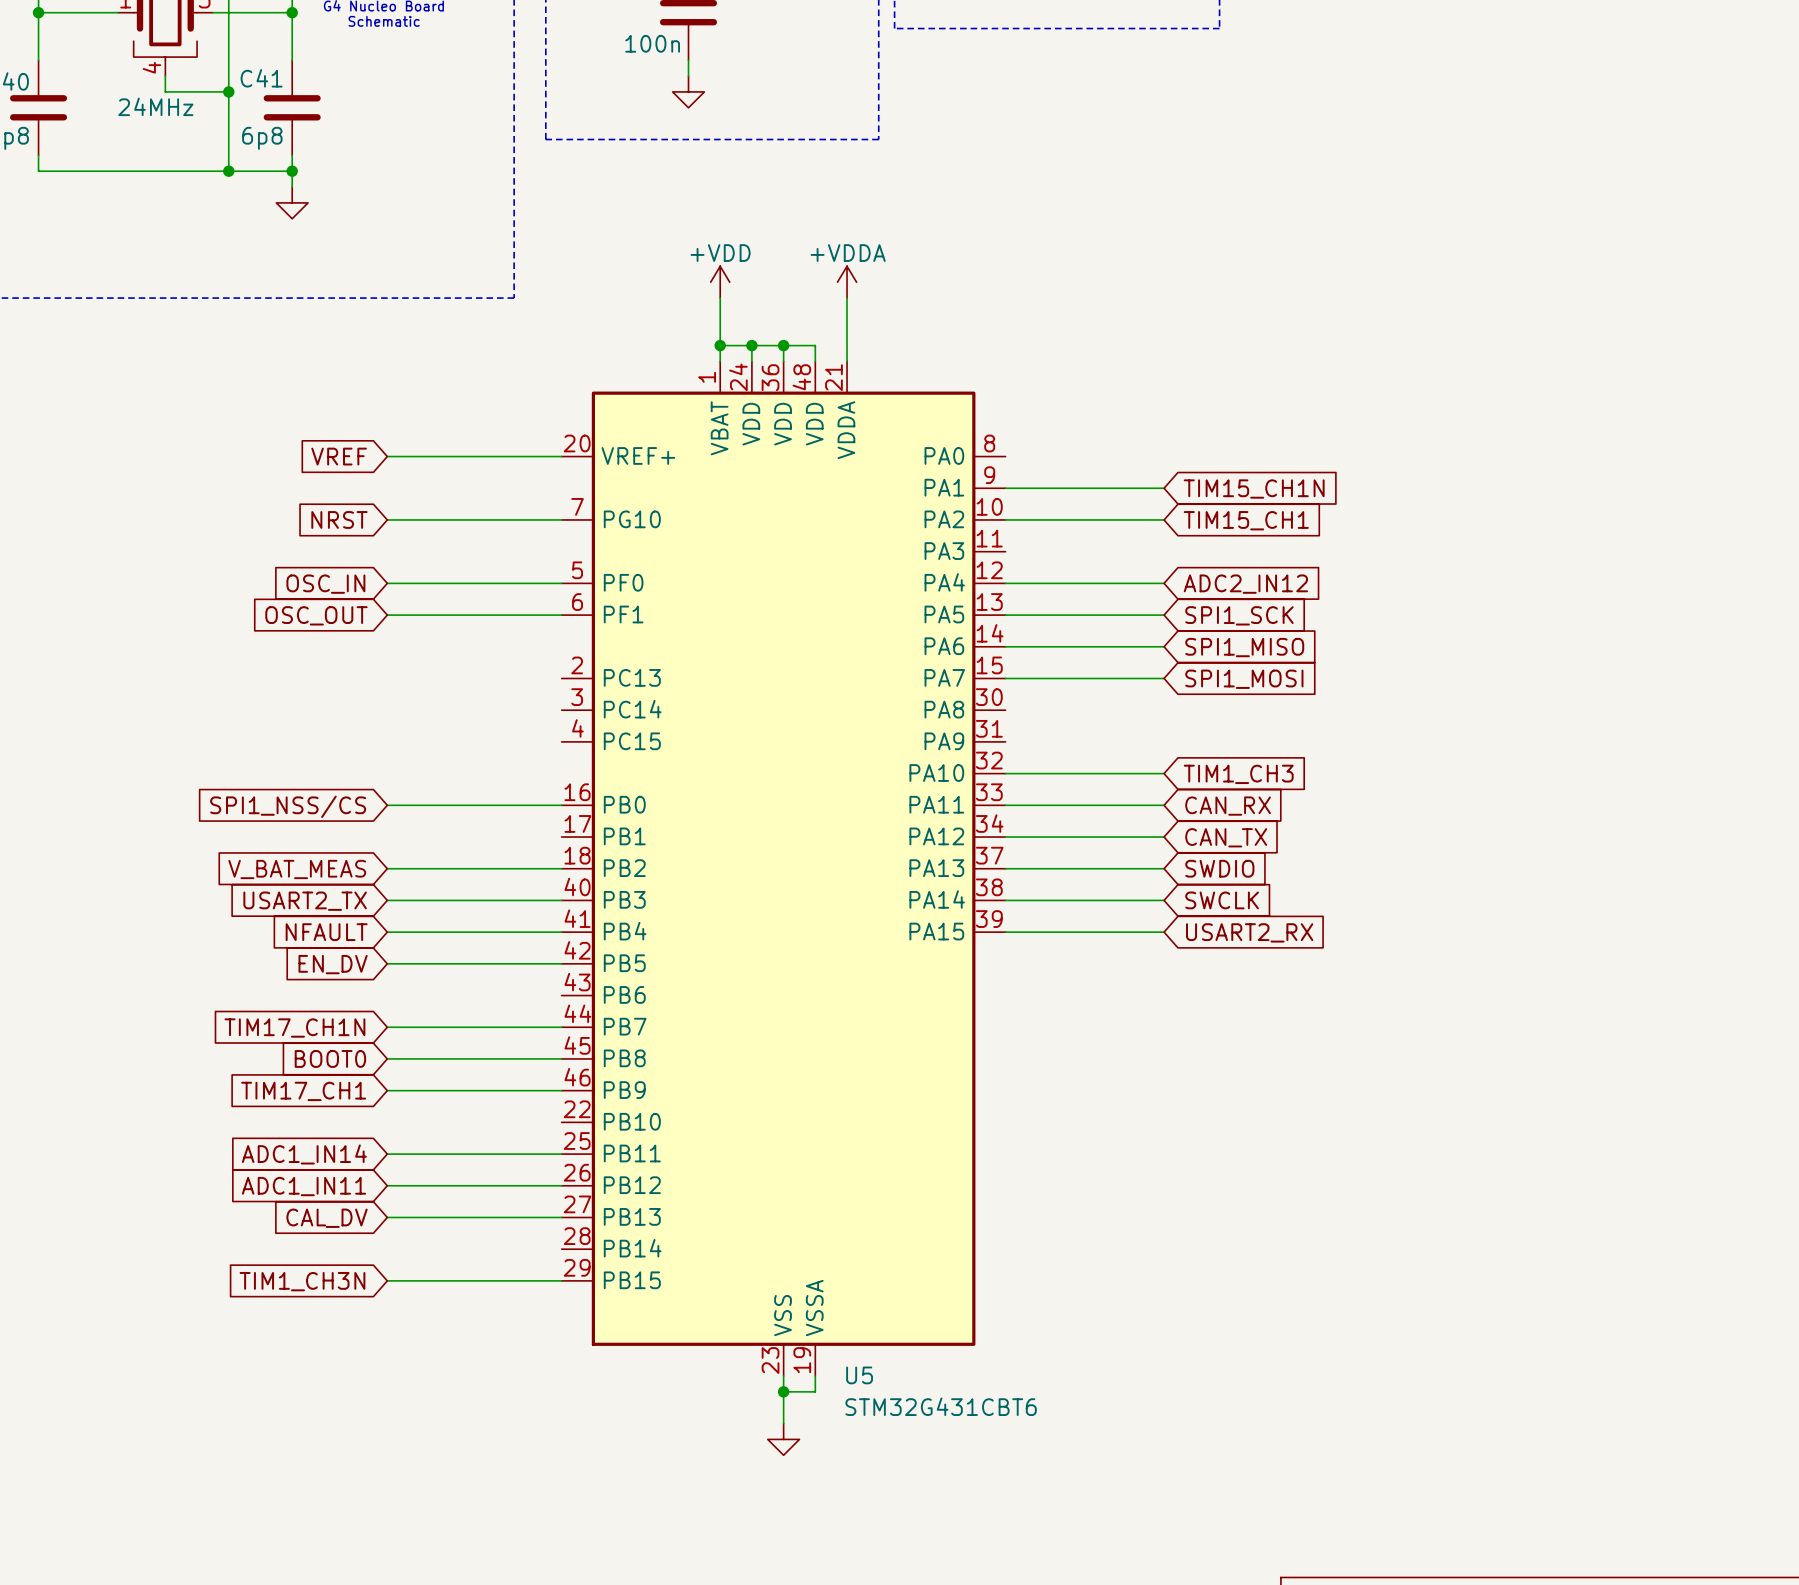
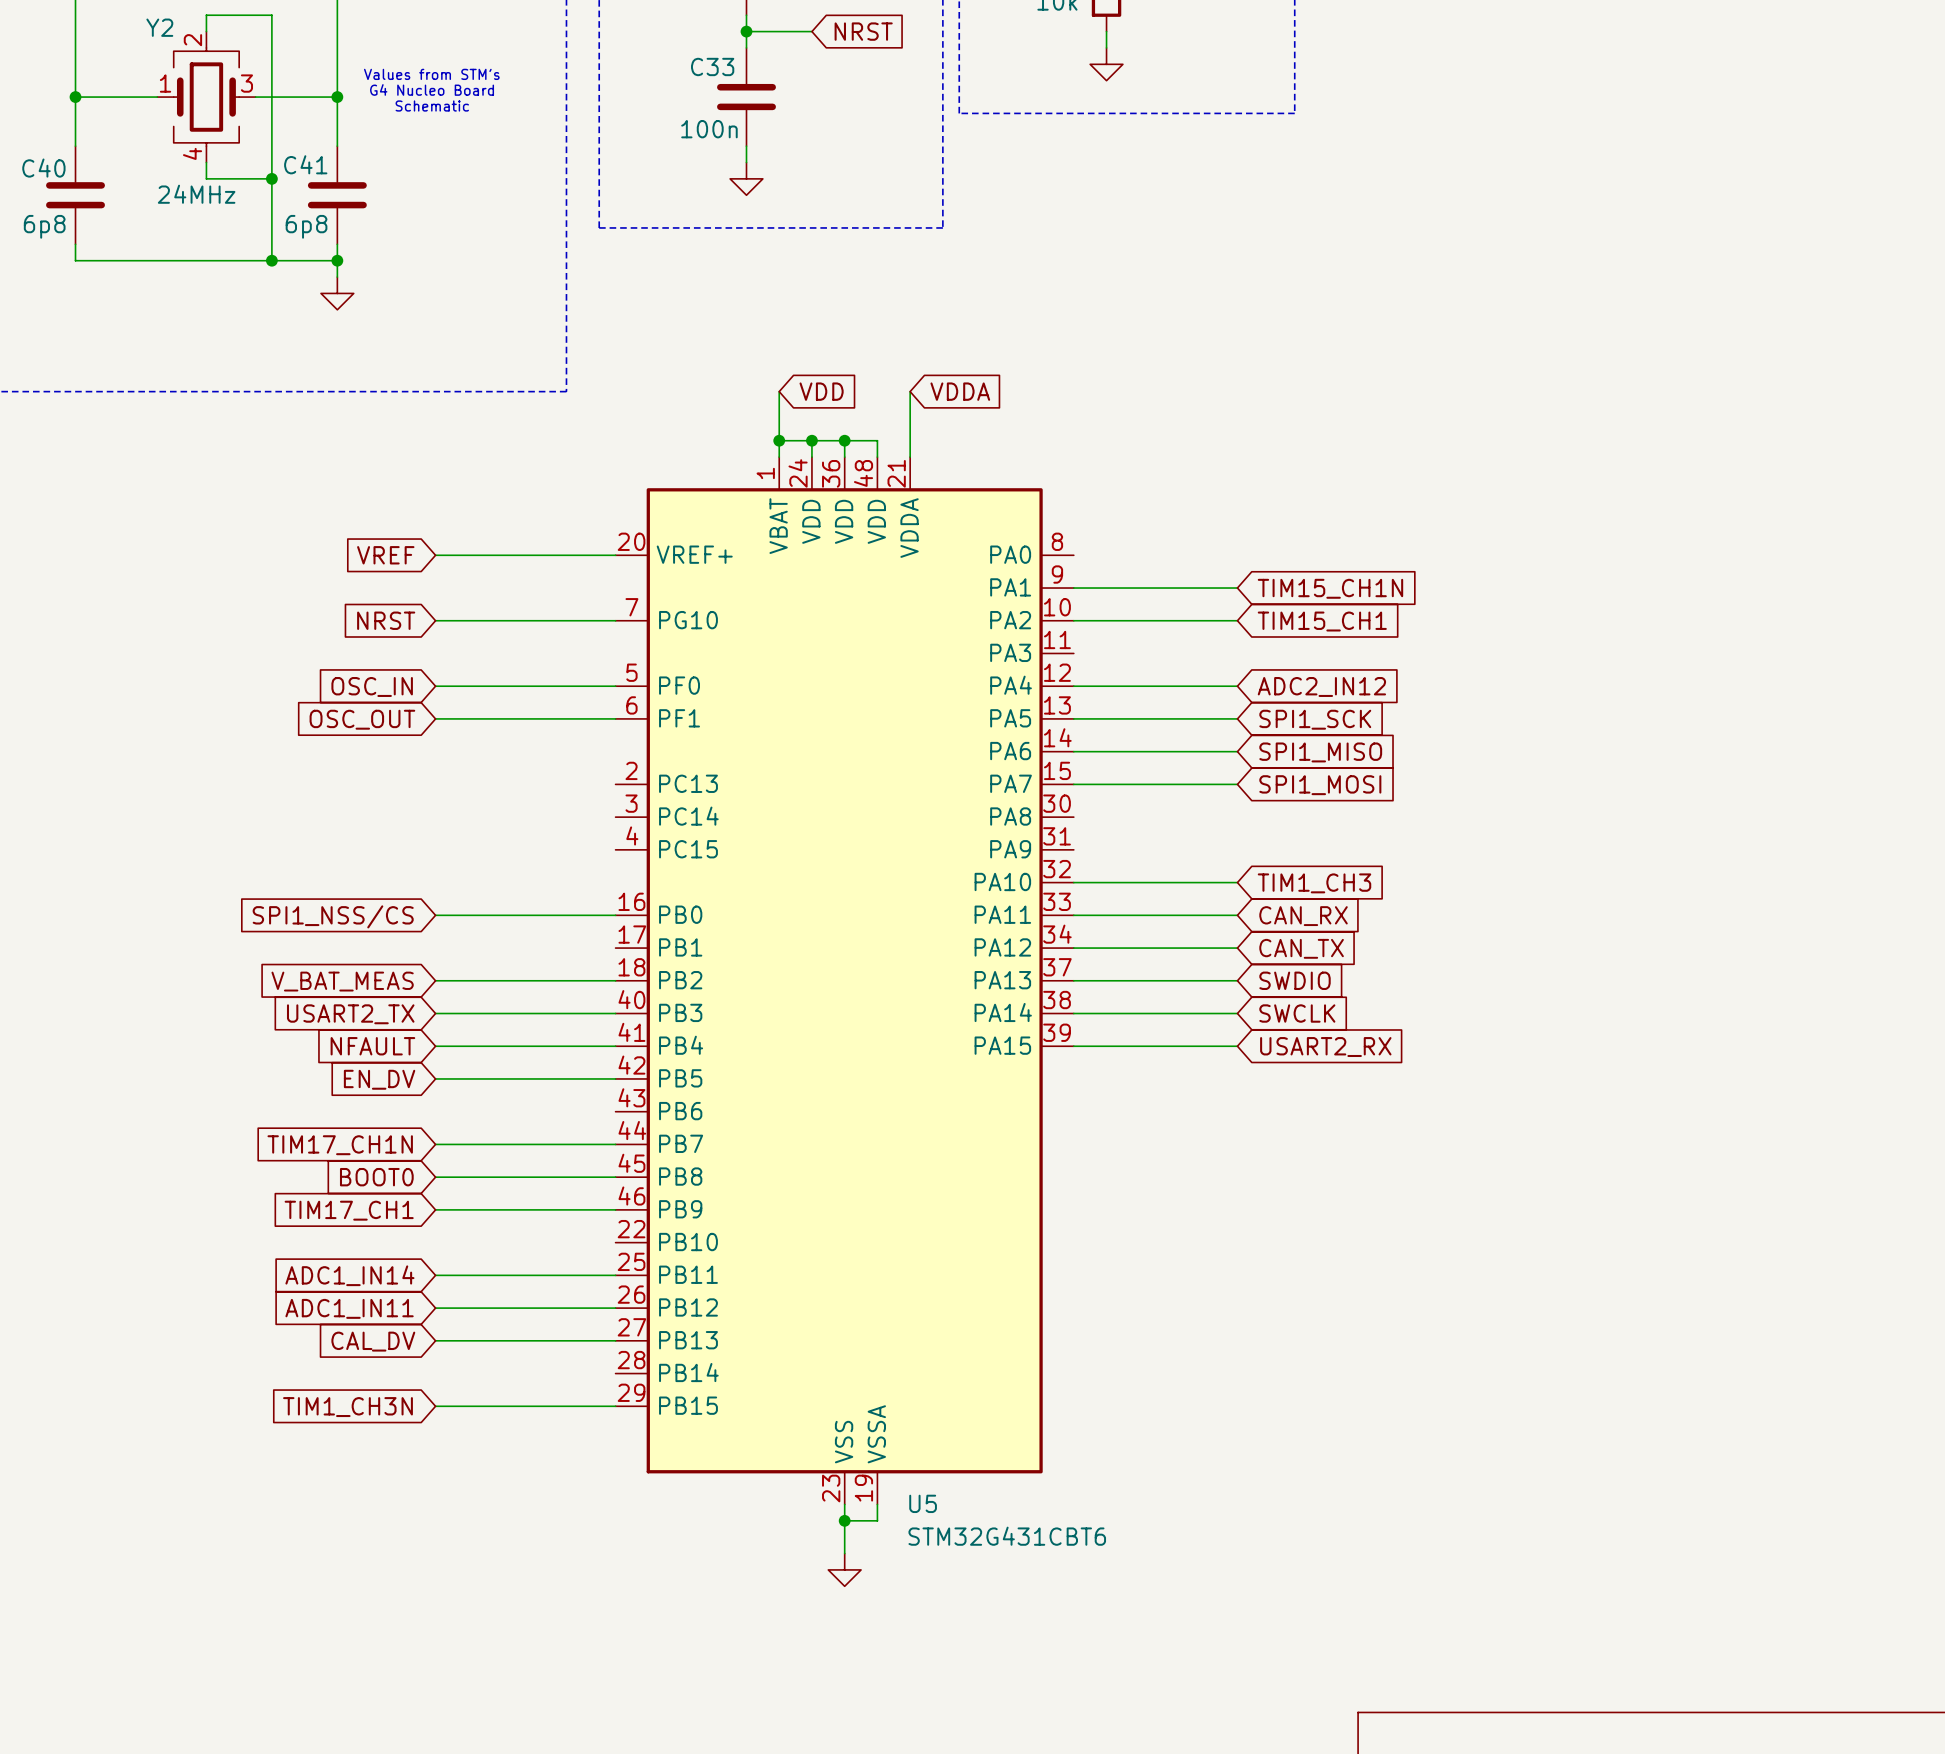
power symbol: +VDD (720, 282) -> none
power symbol: +VDDA (847, 282) -> none
global label: none -> VDD (821, 391)
global label: none -> VDDA (960, 391)

